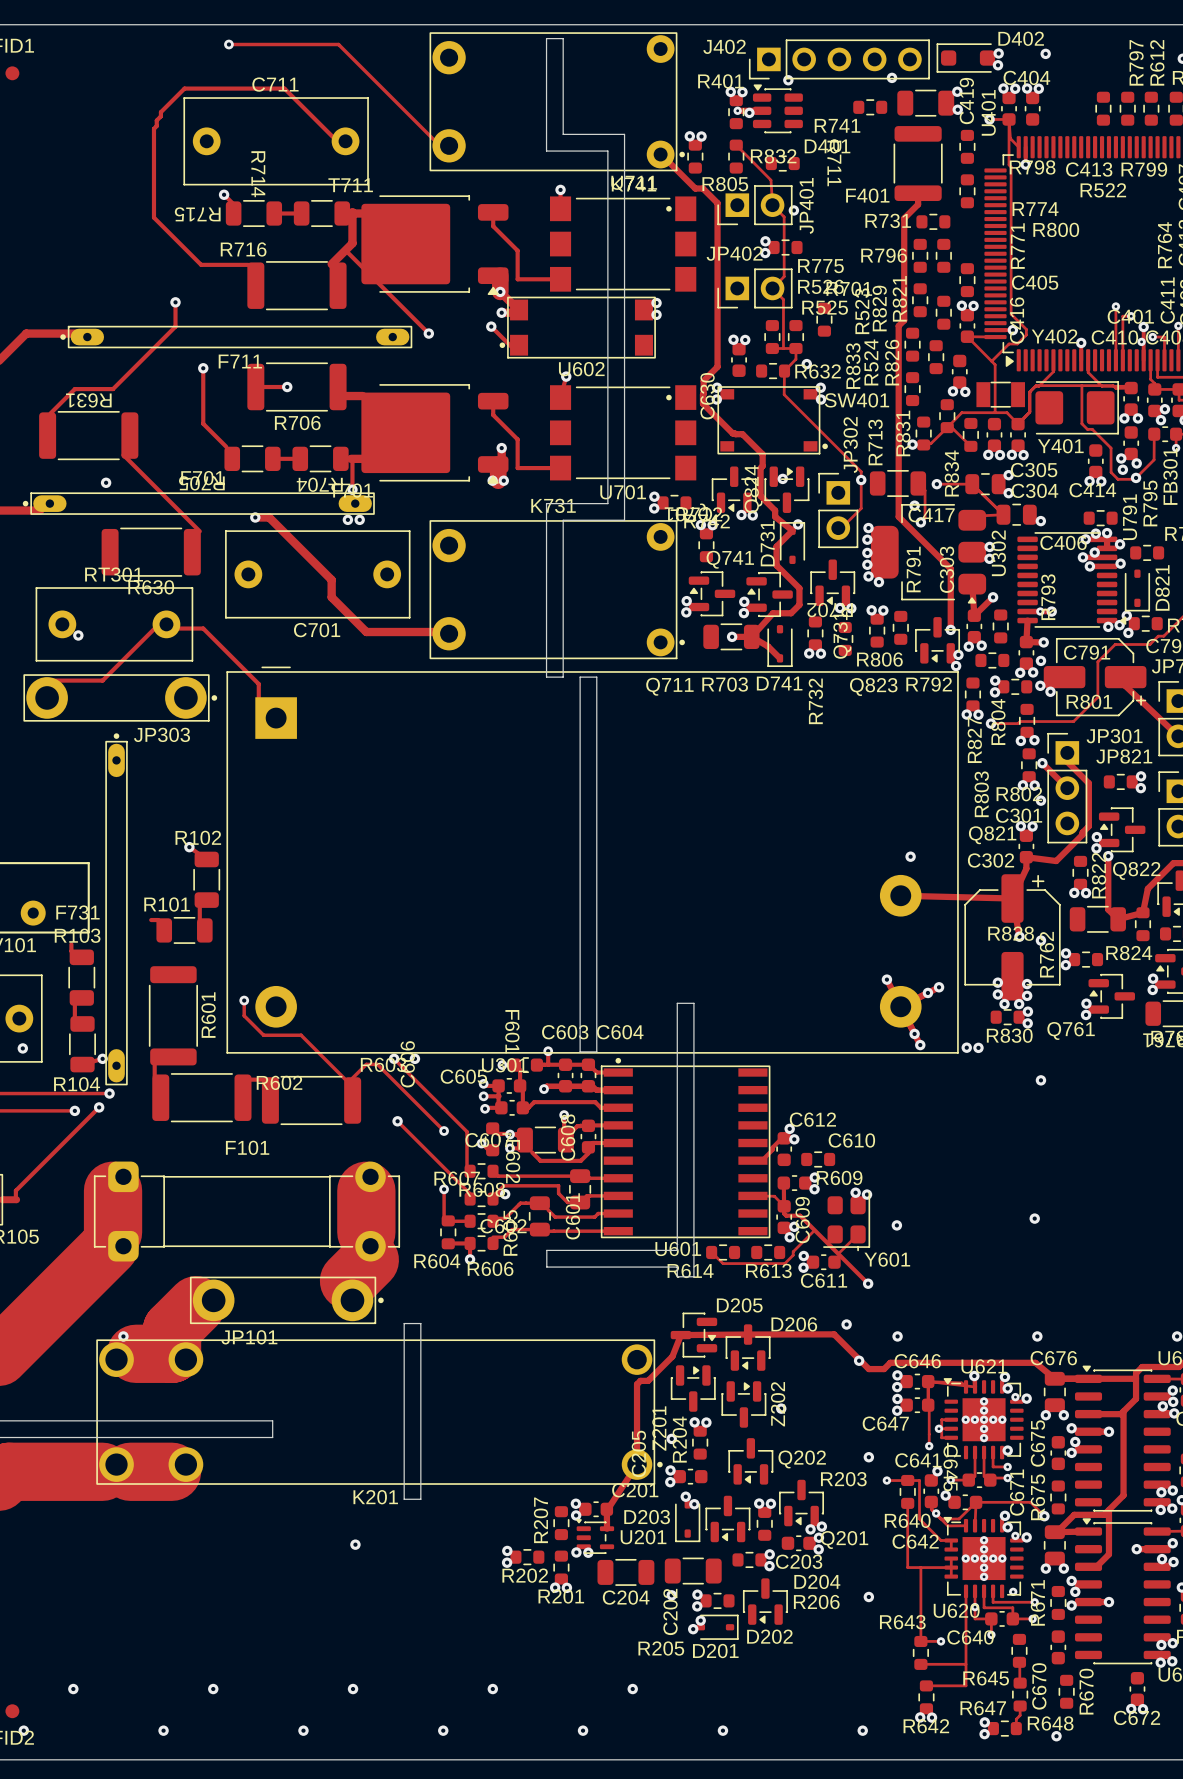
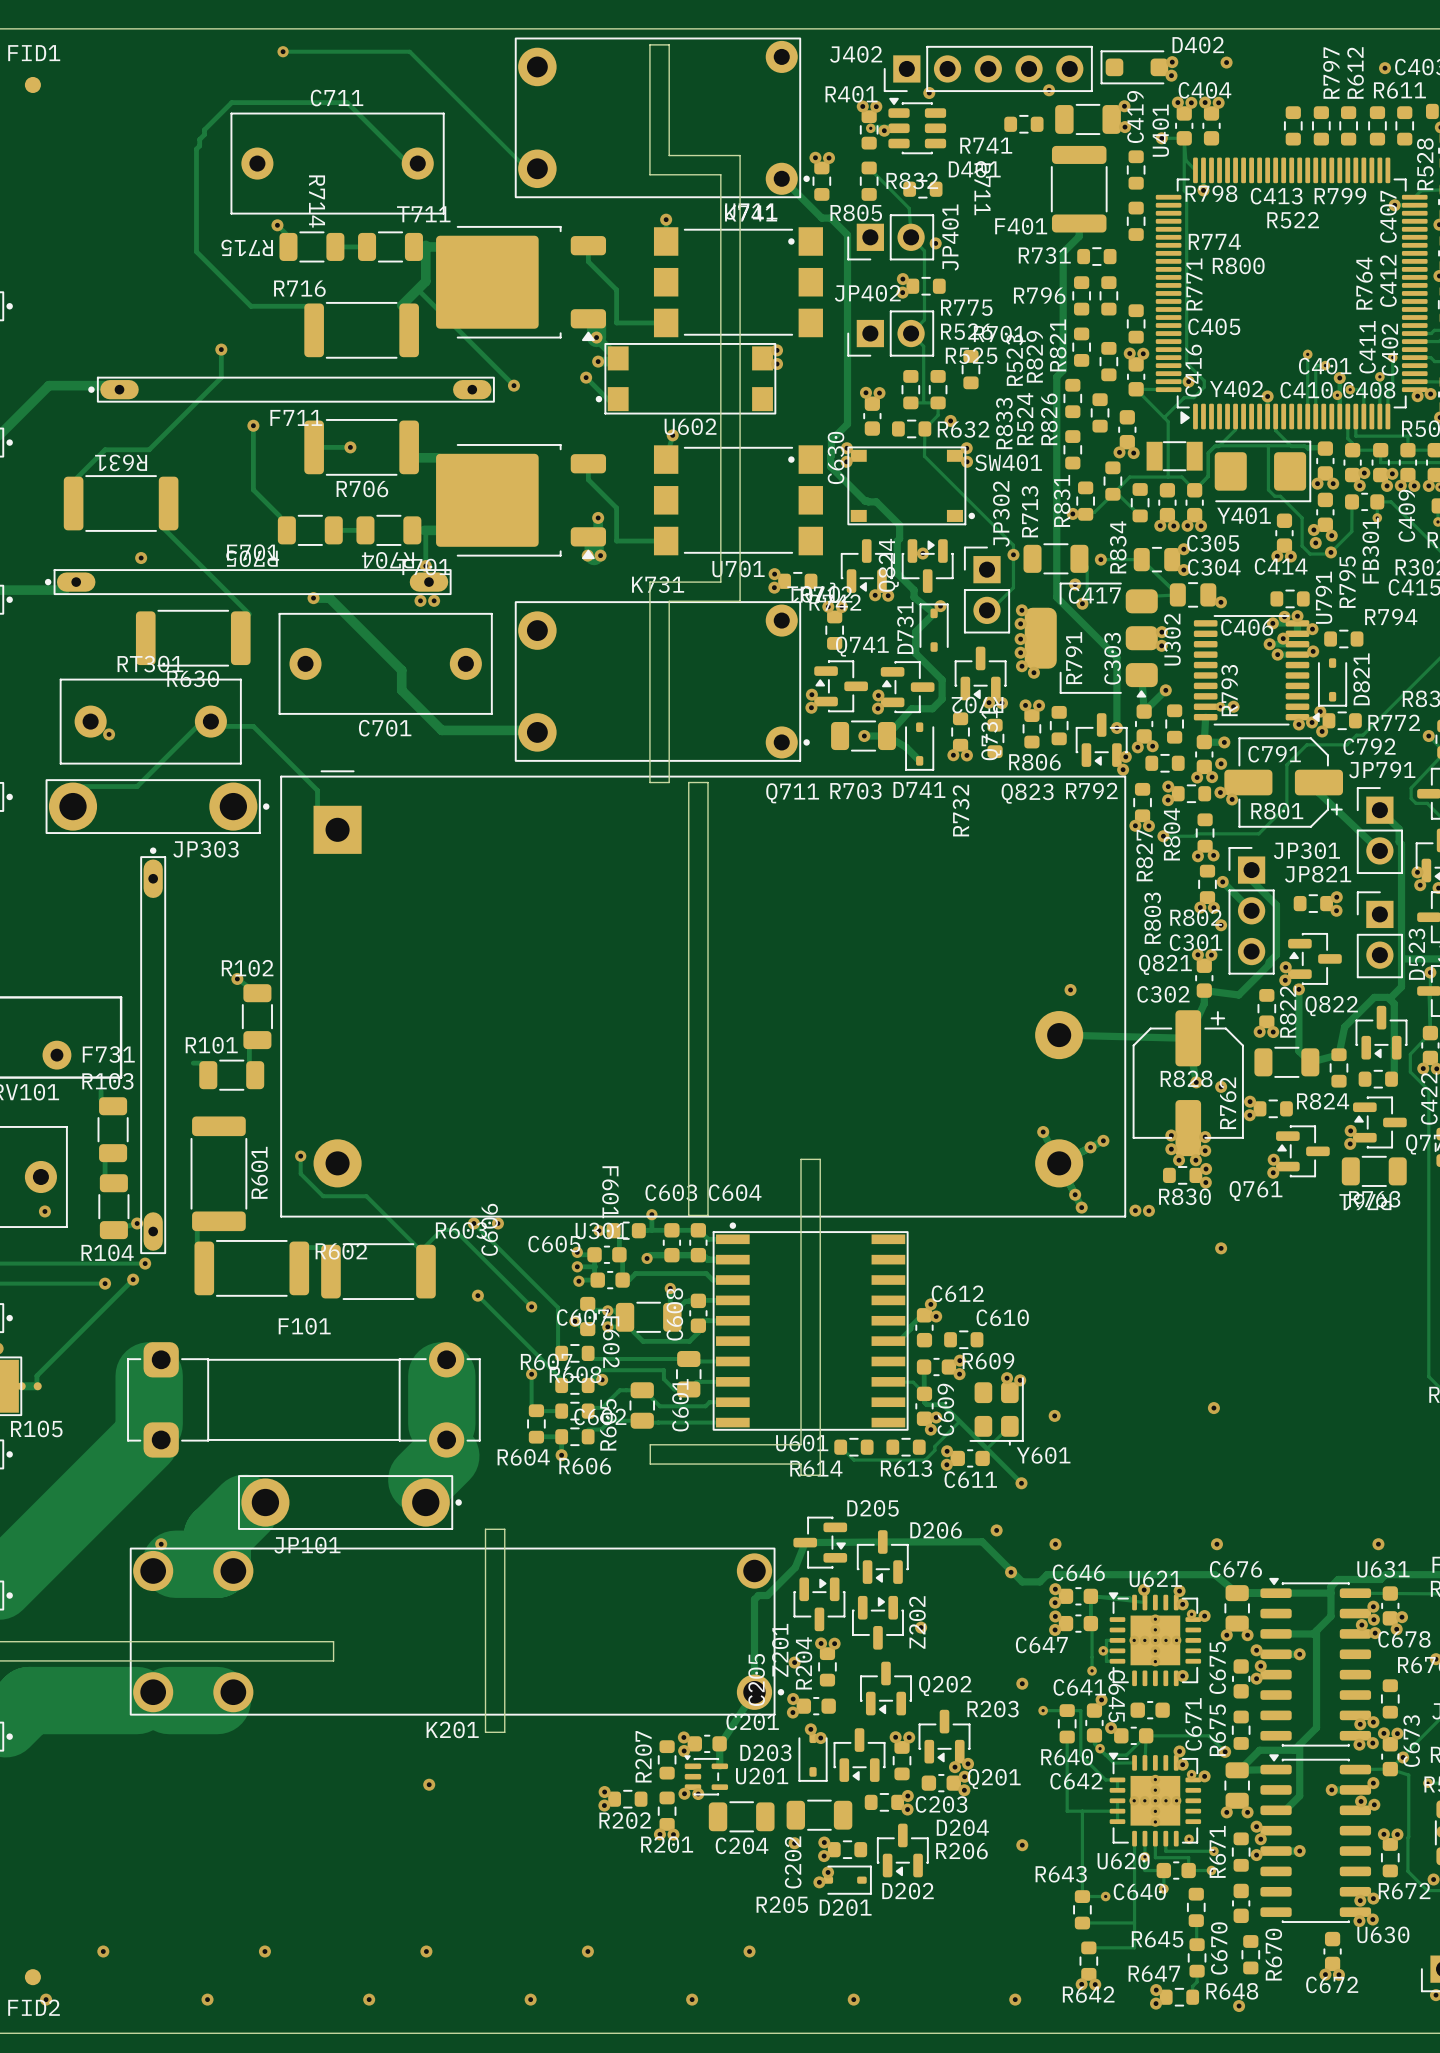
track: (975, 1459) (975, 1476) -> none
track: (984, 1459) (984, 1476) -> none
track: (993, 1459) (993, 1466) (1007, 1466) -> none
via: (1007, 1466) -> none
track: (992, 1478) (1007, 1478) -> none
via: (1007, 1478) -> none
track: (950, 1480) (967, 1480) -> none
via: (950, 1480) -> none

